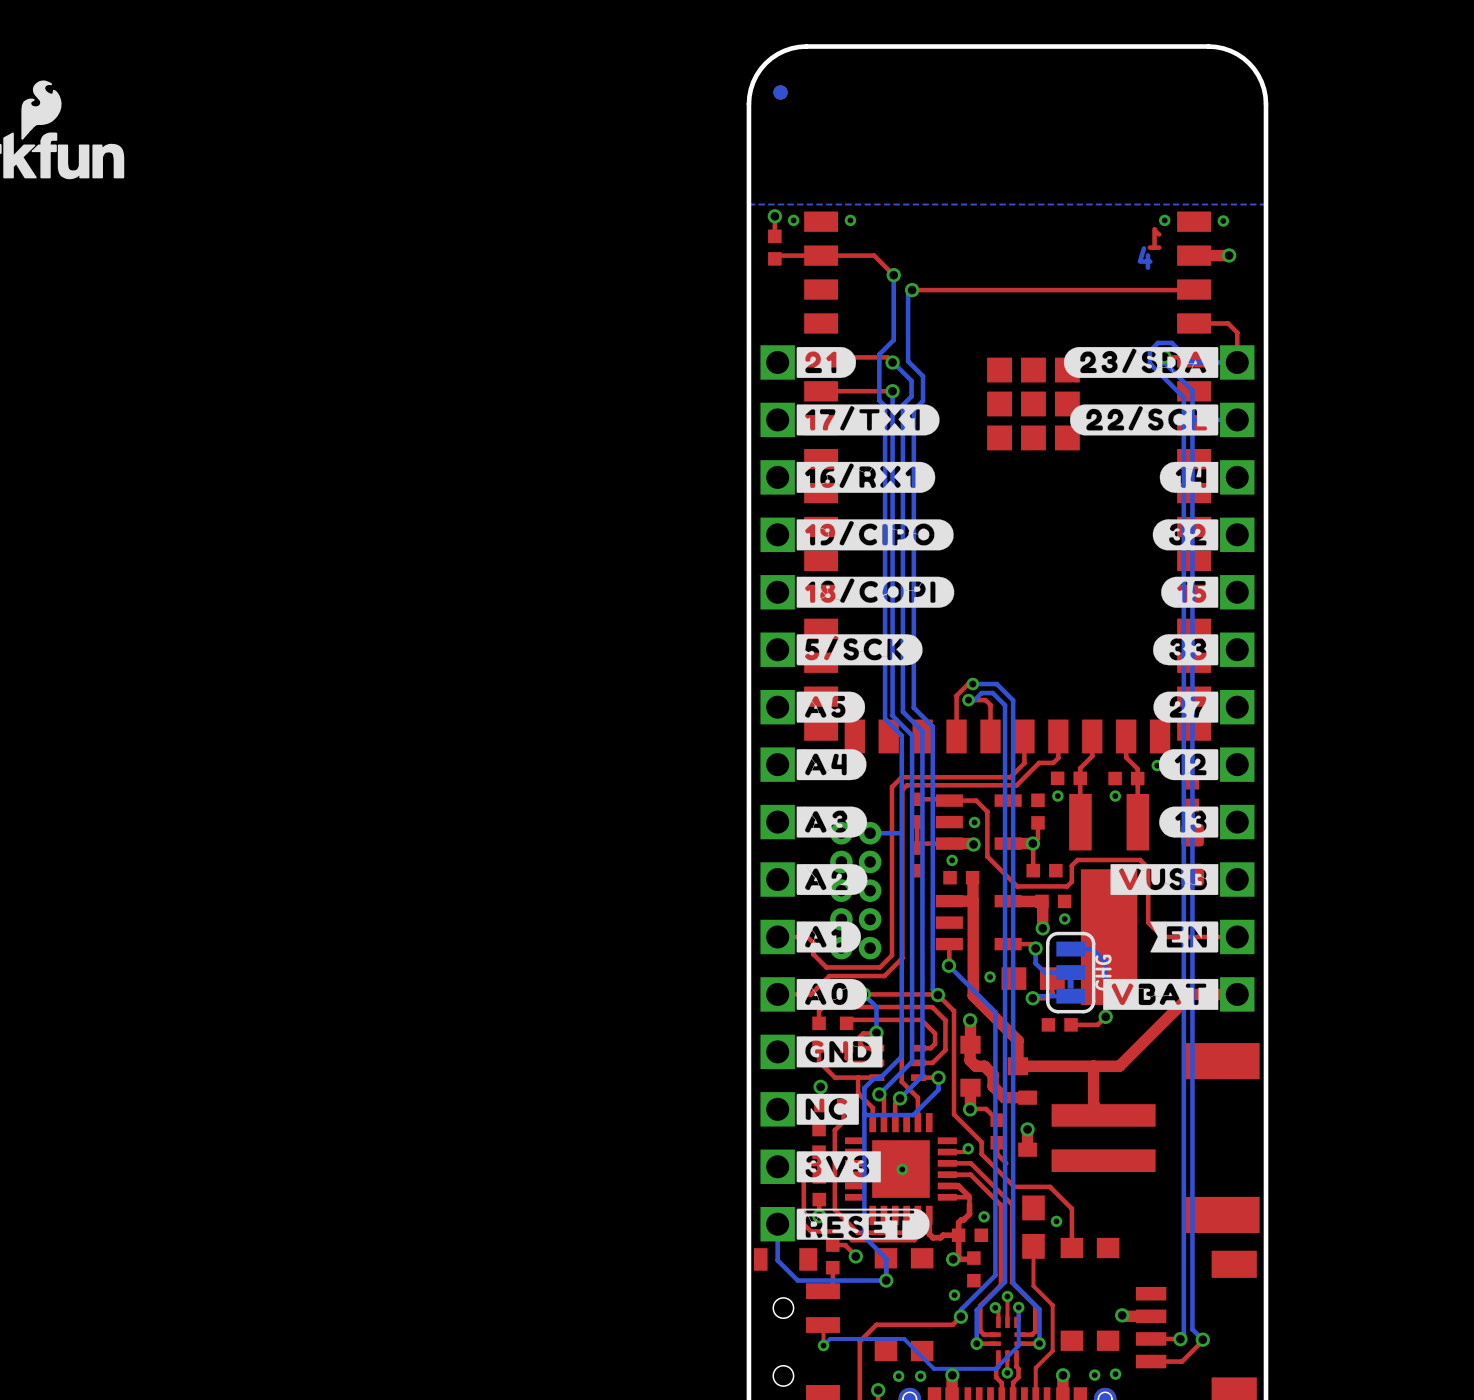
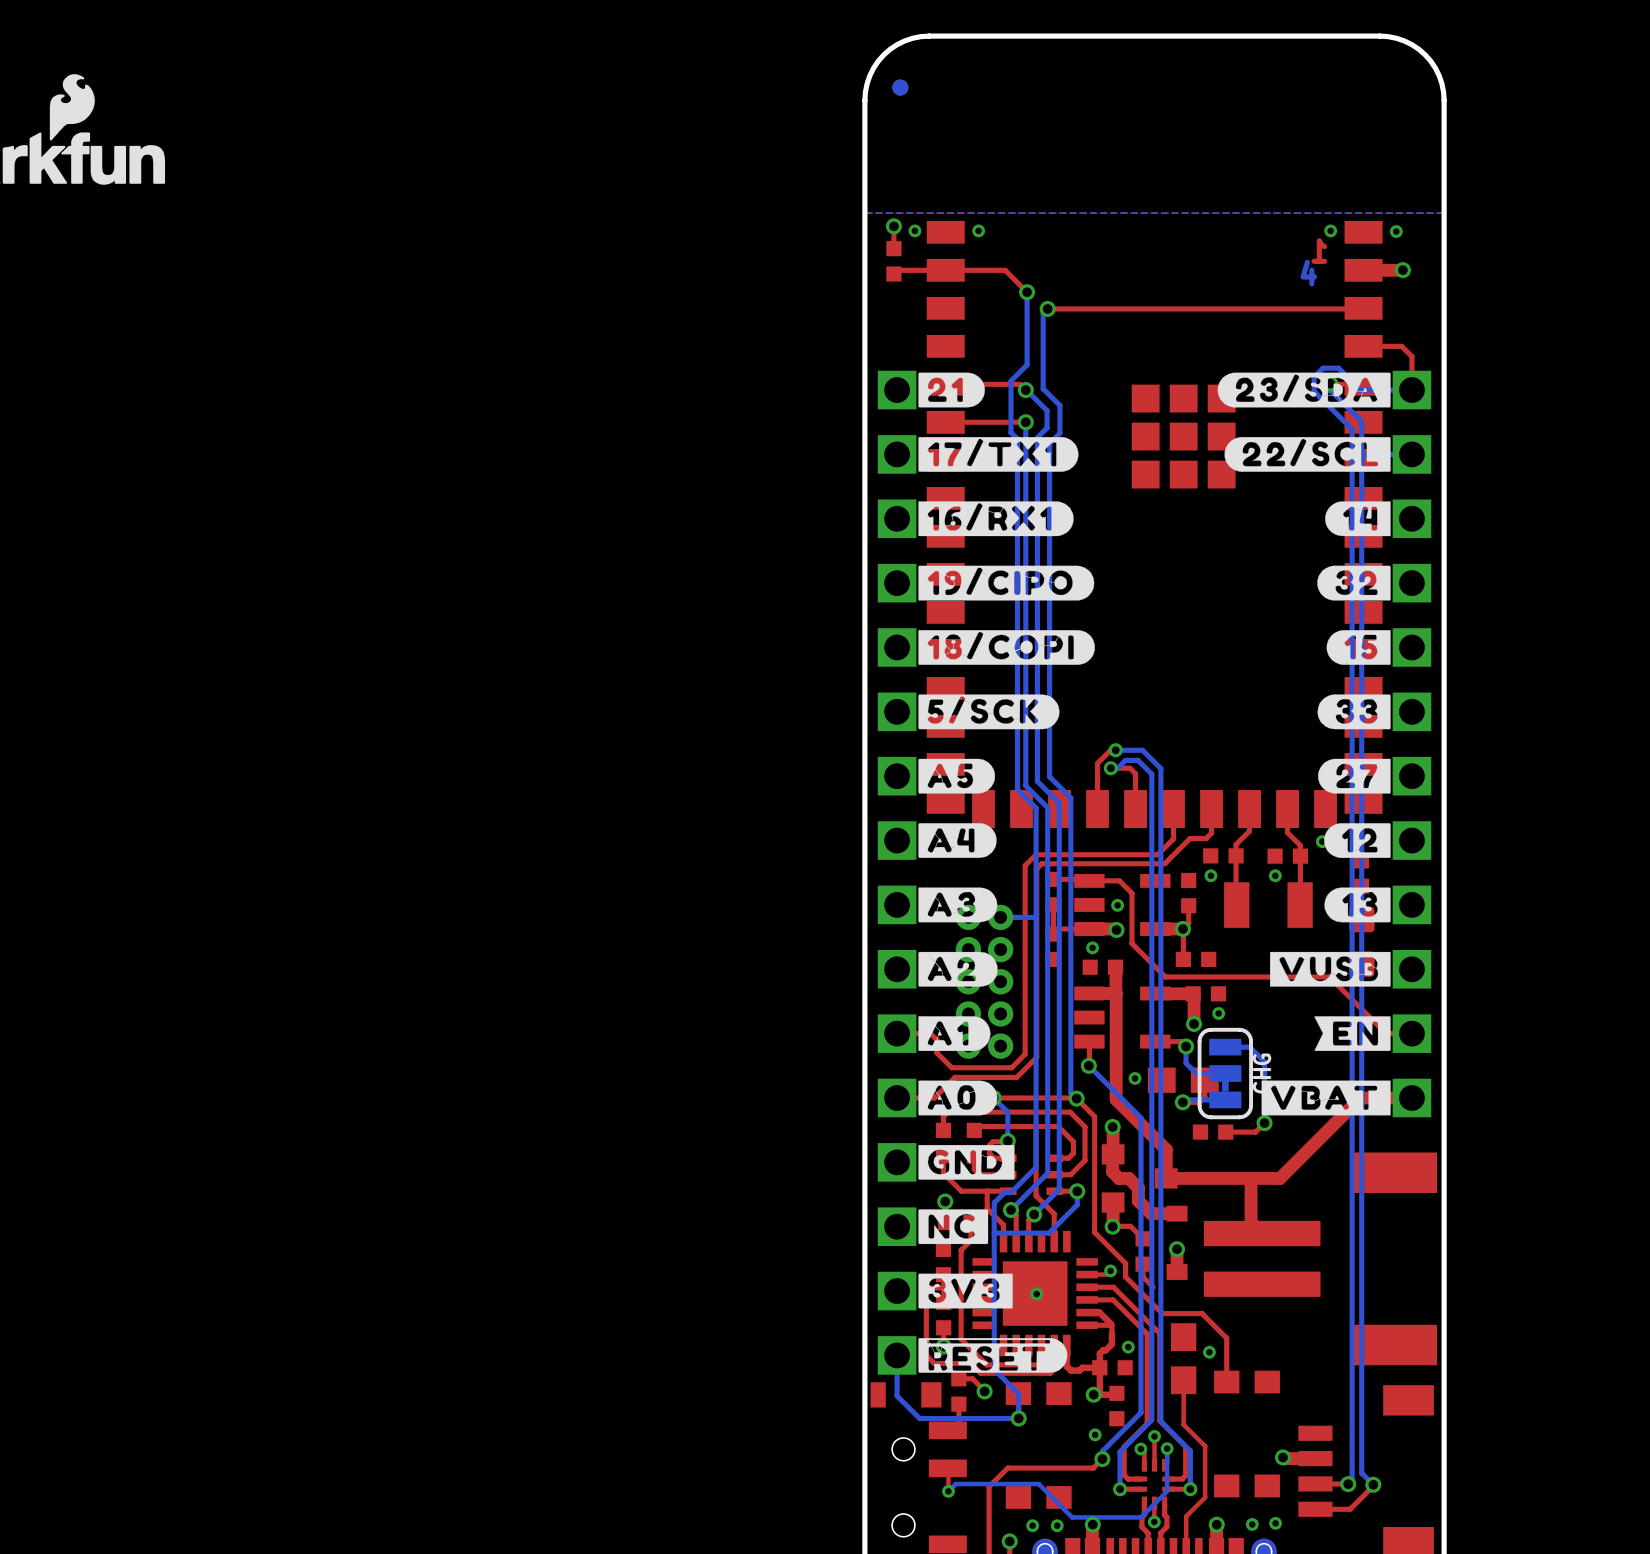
part: none -> (1268, 905)
top track: (1067, 886) (1071, 881) (1071, 865) (1077, 860) (1140, 860) (1148, 868) (1148, 922) (1162, 936) (1214, 936) -> (1221, 977) (1329, 977) (1386, 1033)
part: (1109, 899) -> none

